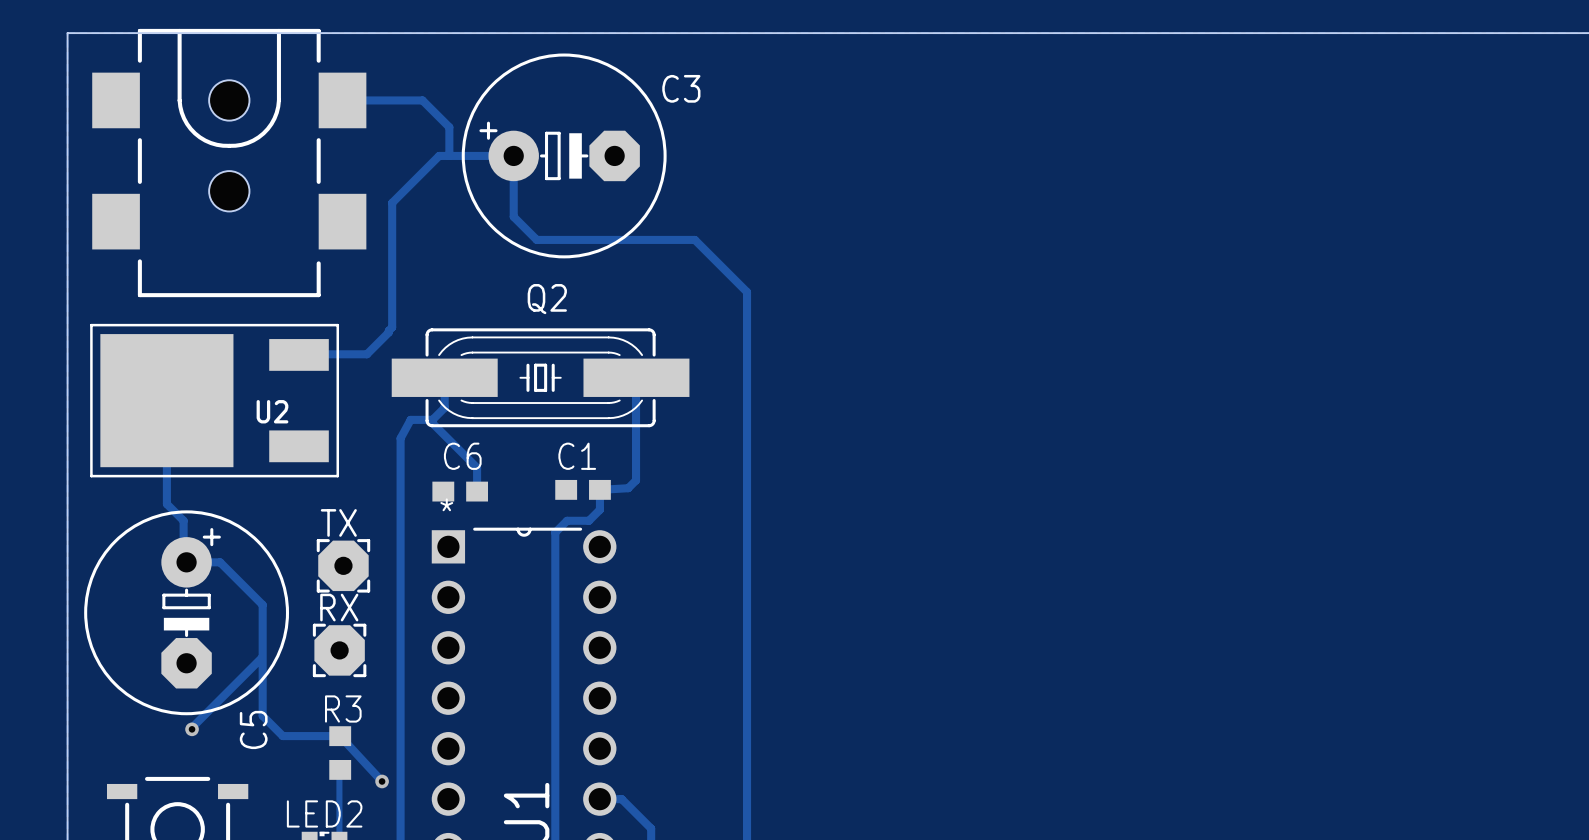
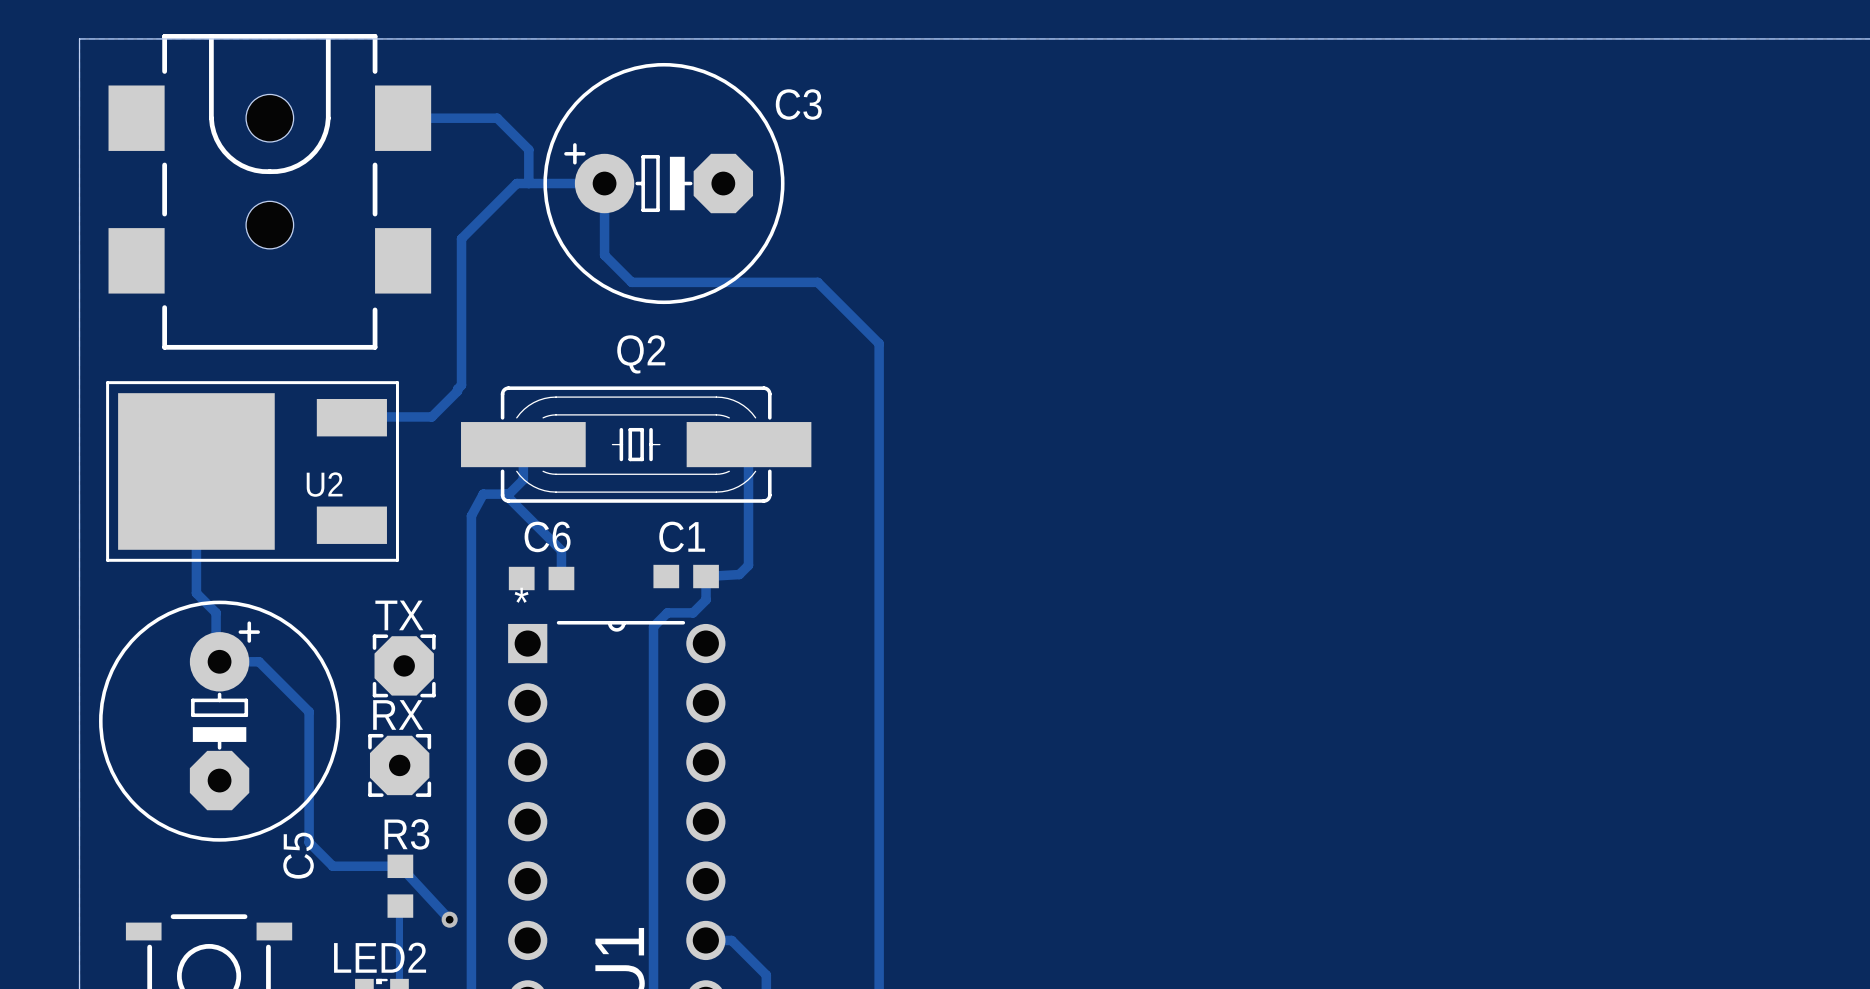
track: (261, 657) (192, 729) -> none
via: (192, 729) -> none

